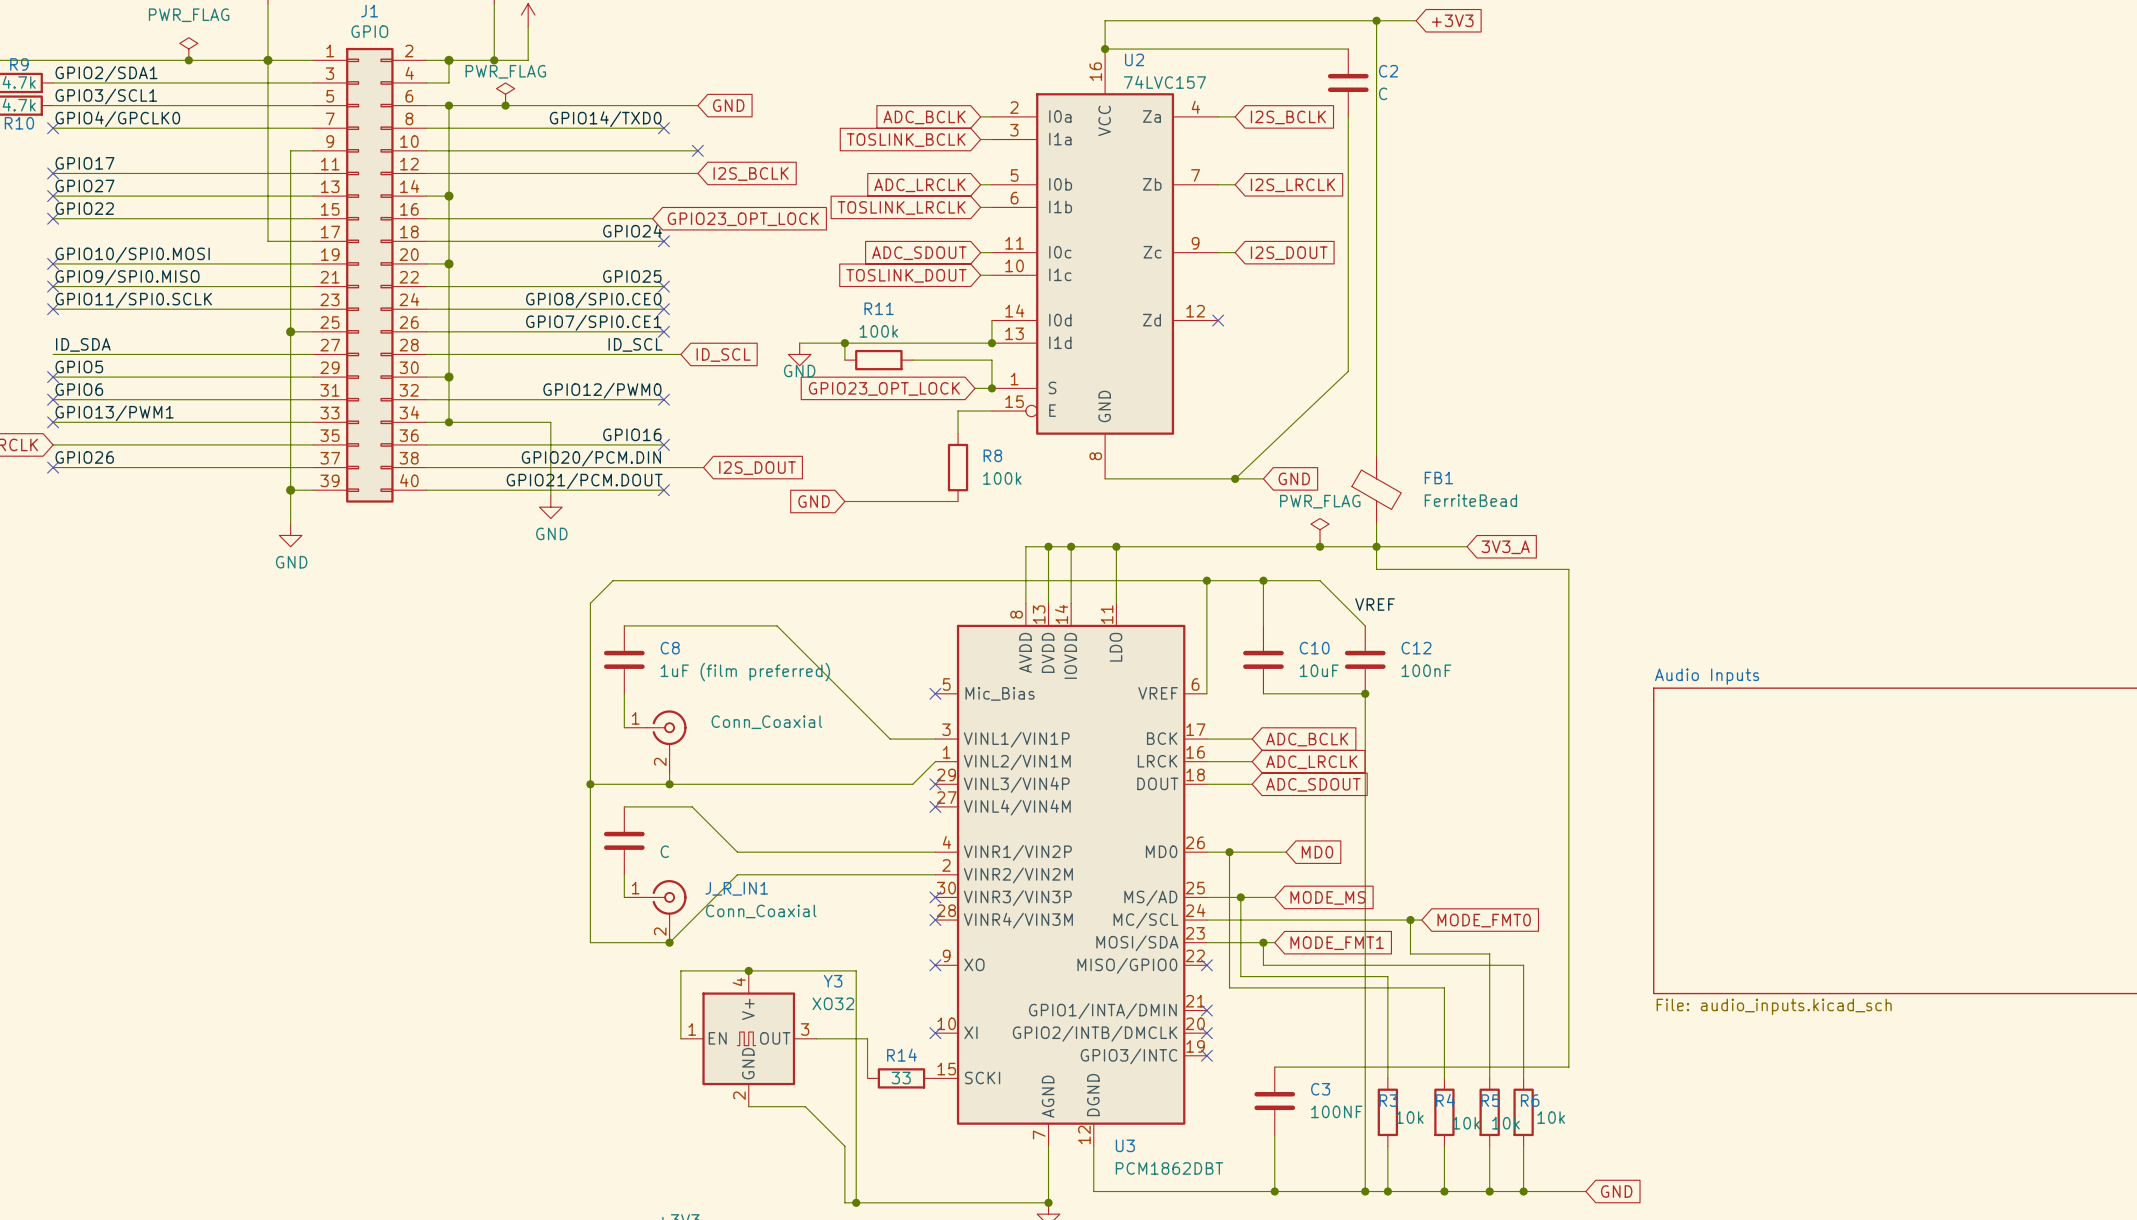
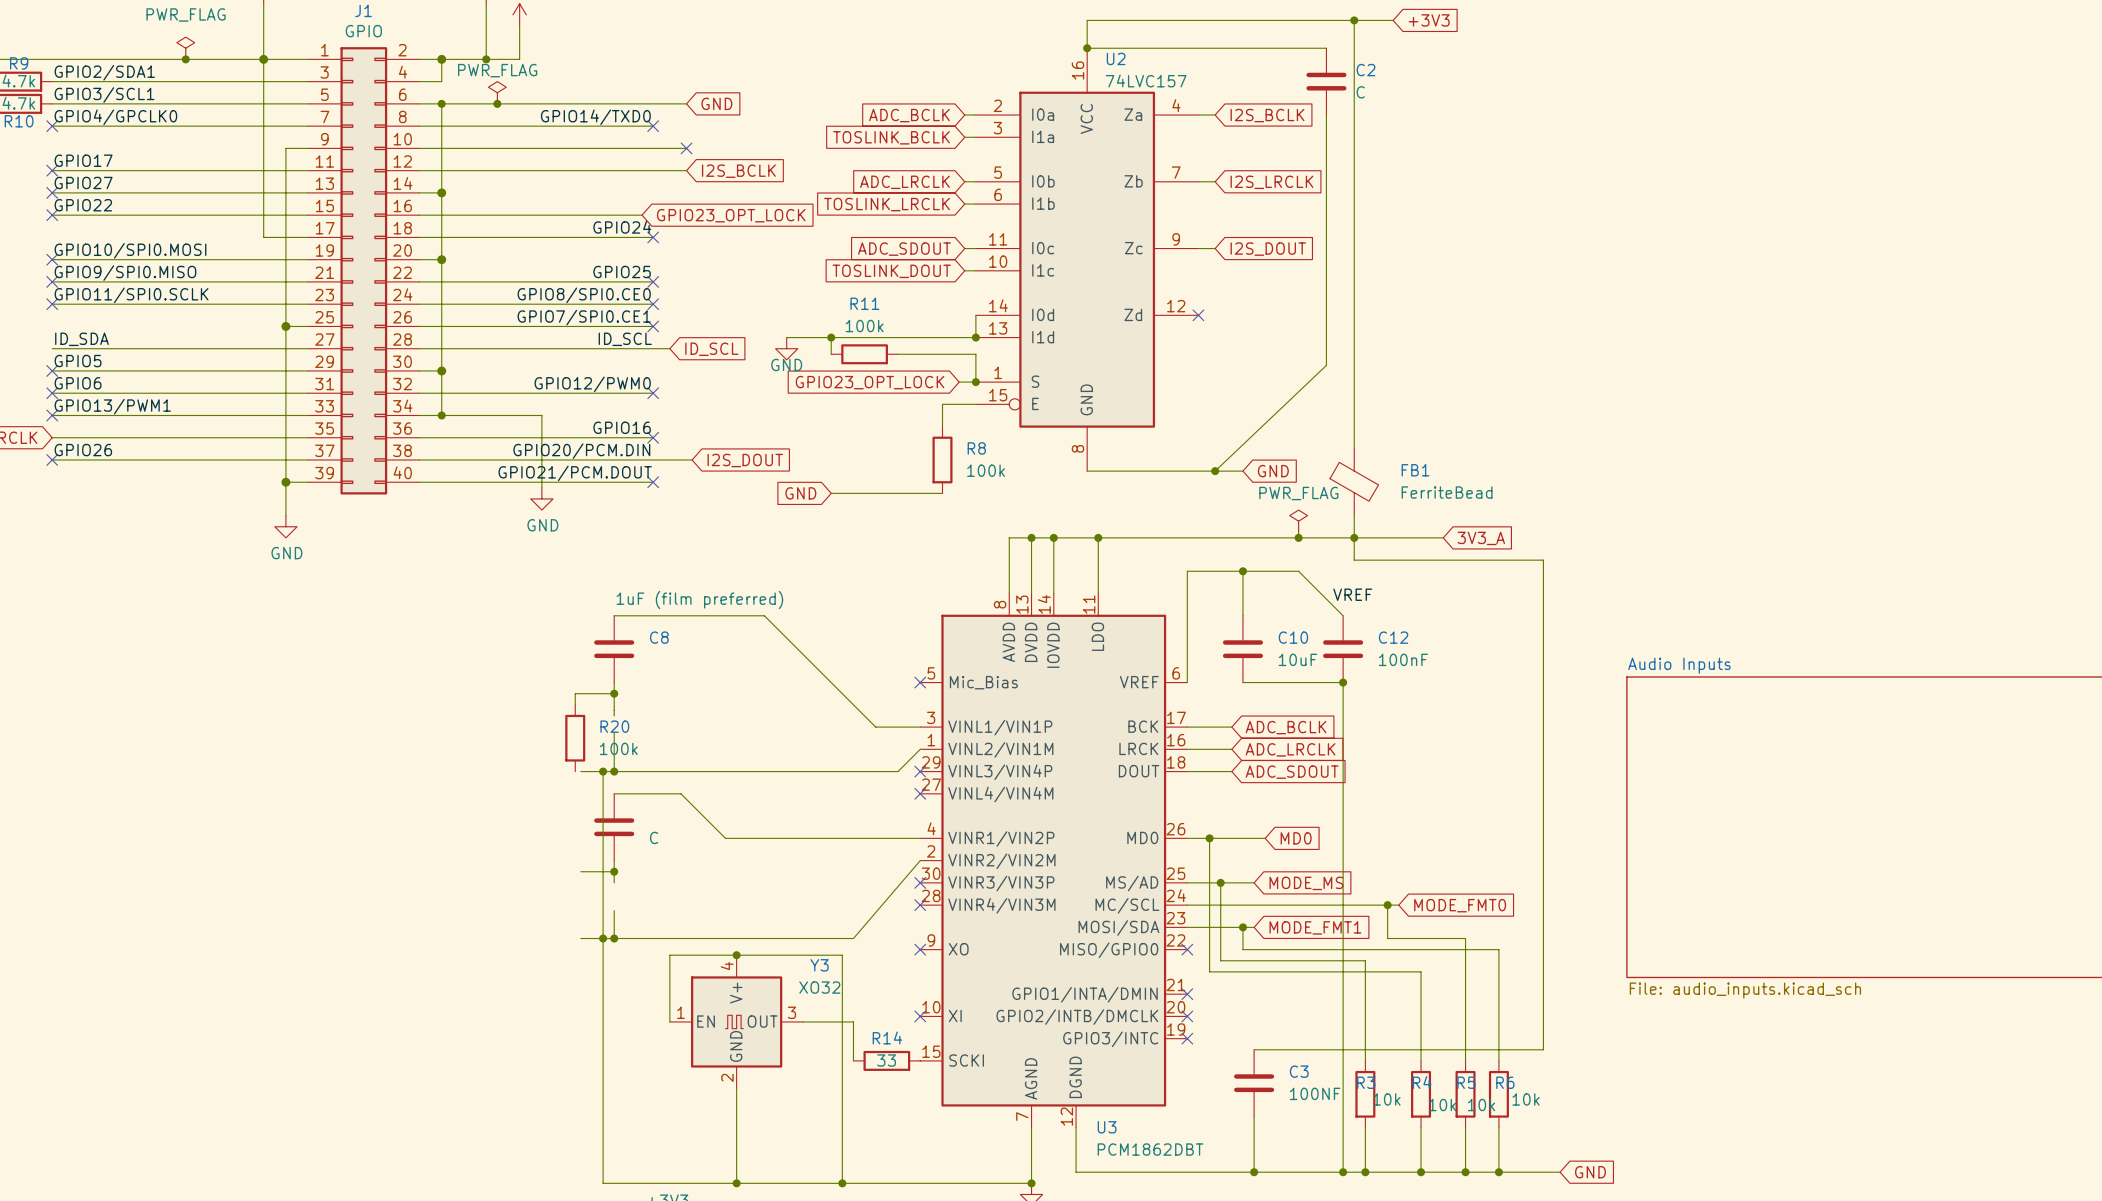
wire: (1206, 580) (613, 580) (590, 603) (590, 942) (669, 942) (737, 874) (935, 874) -> (580, 938) (853, 938) (920, 860)
junction: (1206, 580) -> none
C8 value position: 1uF (film preferred) (745, 672) -> 1uF (film preferred) (699, 600)
wire: none -> (614, 693) (575, 693) (575, 704)
junction: none -> (614, 693)
part: Conn_Coaxial (655, 741) -> none
wire: none -> (614, 732) (614, 771)
R20: none -> 100k (575, 738)
wire: (669, 772) (669, 784) -> none
junction: (590, 784) -> none
wire: none -> (603, 771) (603, 1183) (831, 1183)
junction: none -> (603, 771)
junction: none -> (614, 771)
junction: (669, 784) -> none
wire: none -> (580, 871) (614, 871)
junction: none -> (614, 871)
J_R_IN1: Conn_Coaxial (655, 911) -> none
wire: none -> (614, 910) (614, 938)
junction: (669, 942) -> none
junction: none -> (603, 938)
junction: none -> (614, 938)
wire: (748, 1106) (805, 1106) (844, 1146) (844, 1202) -> (736, 1088) (736, 1183)
junction: none -> (736, 1183)

